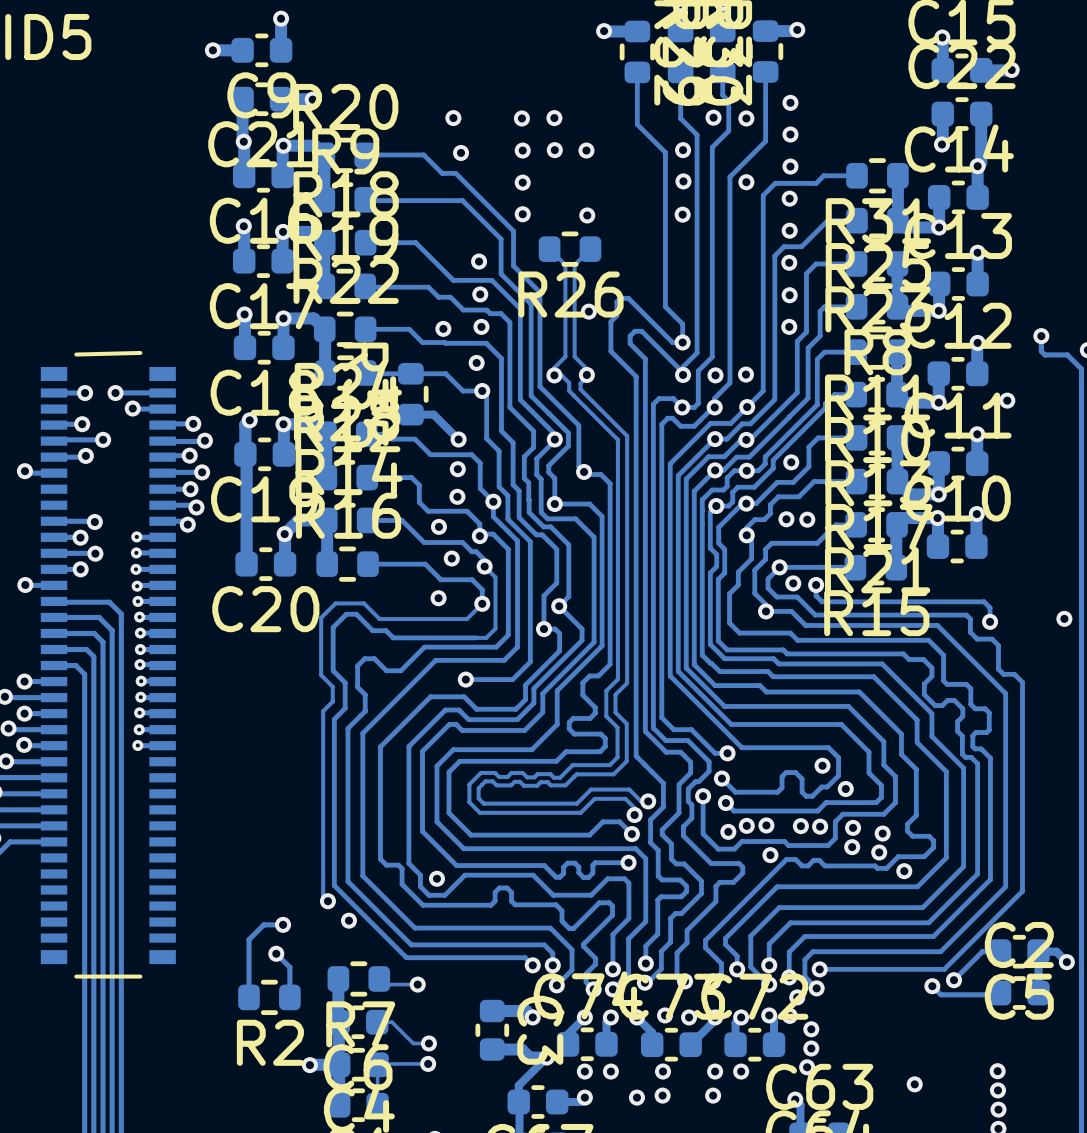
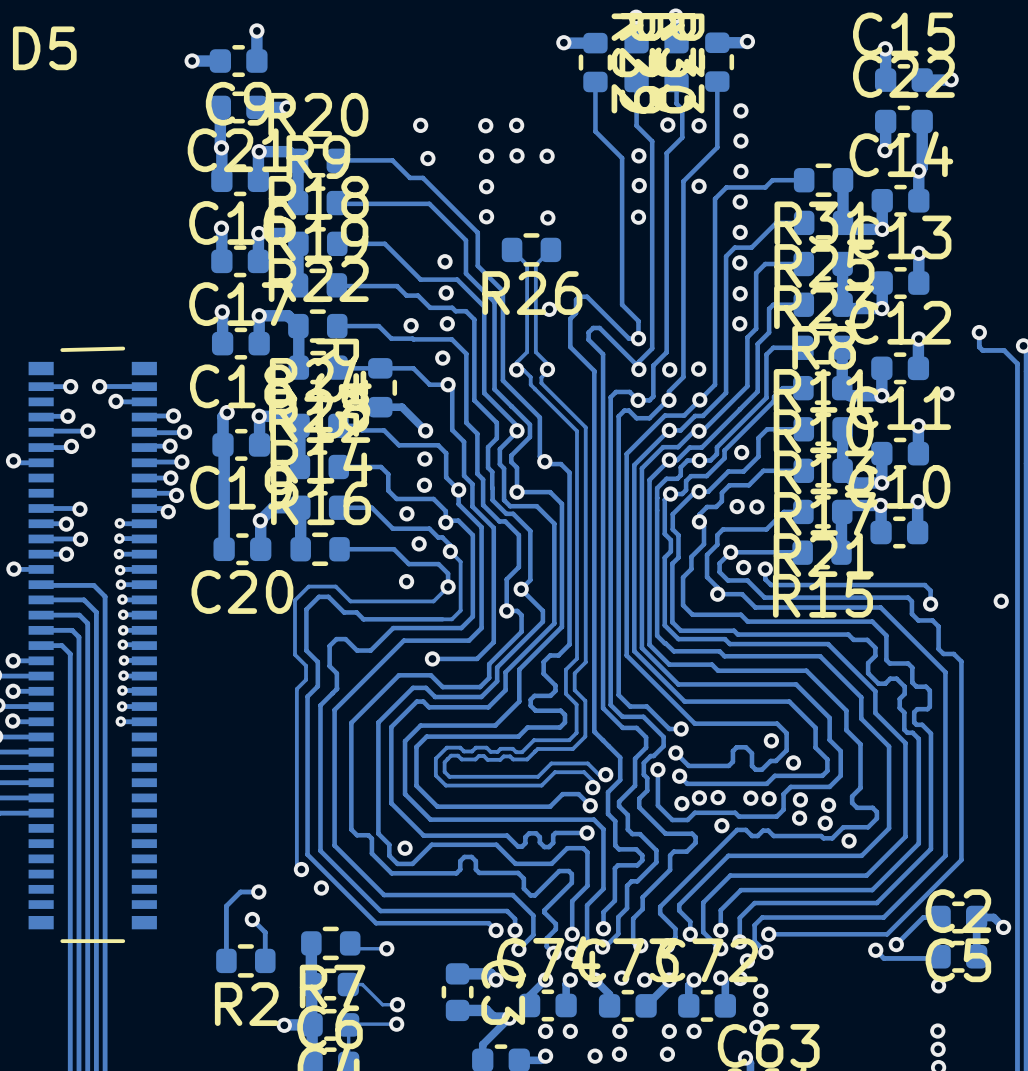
via position: (914, 1084) -> (938, 985)

